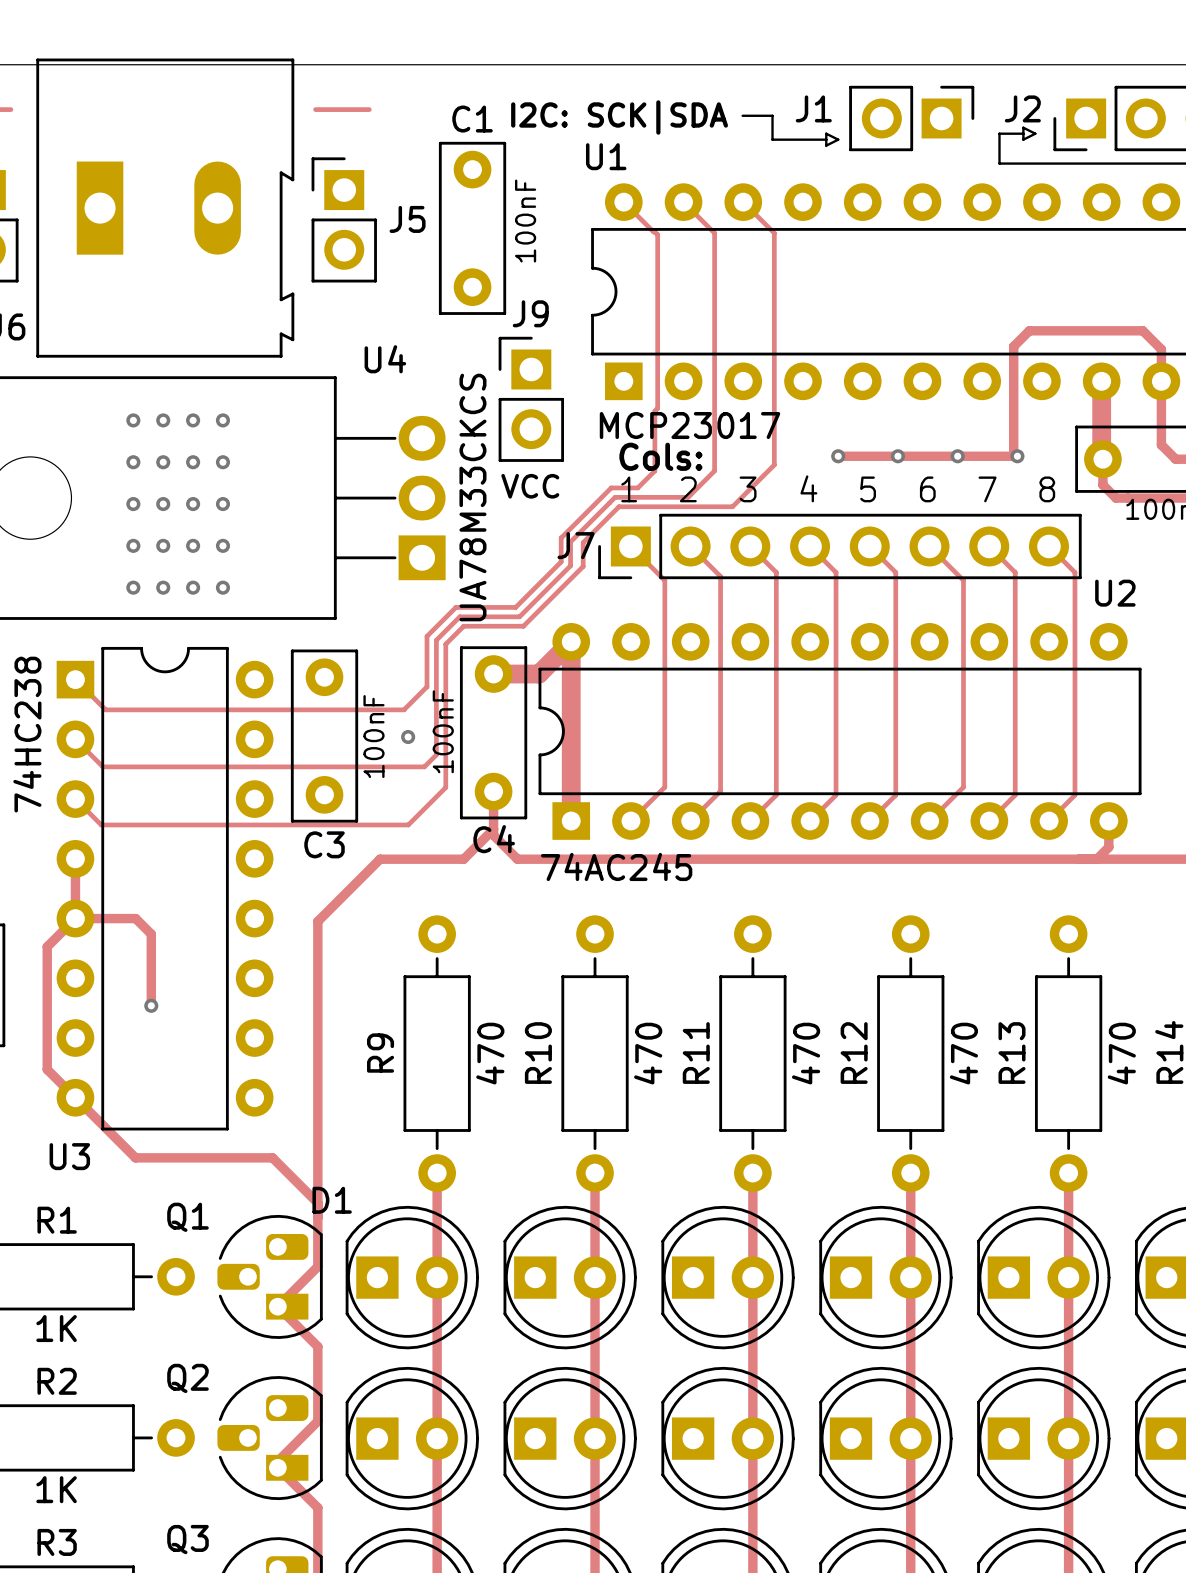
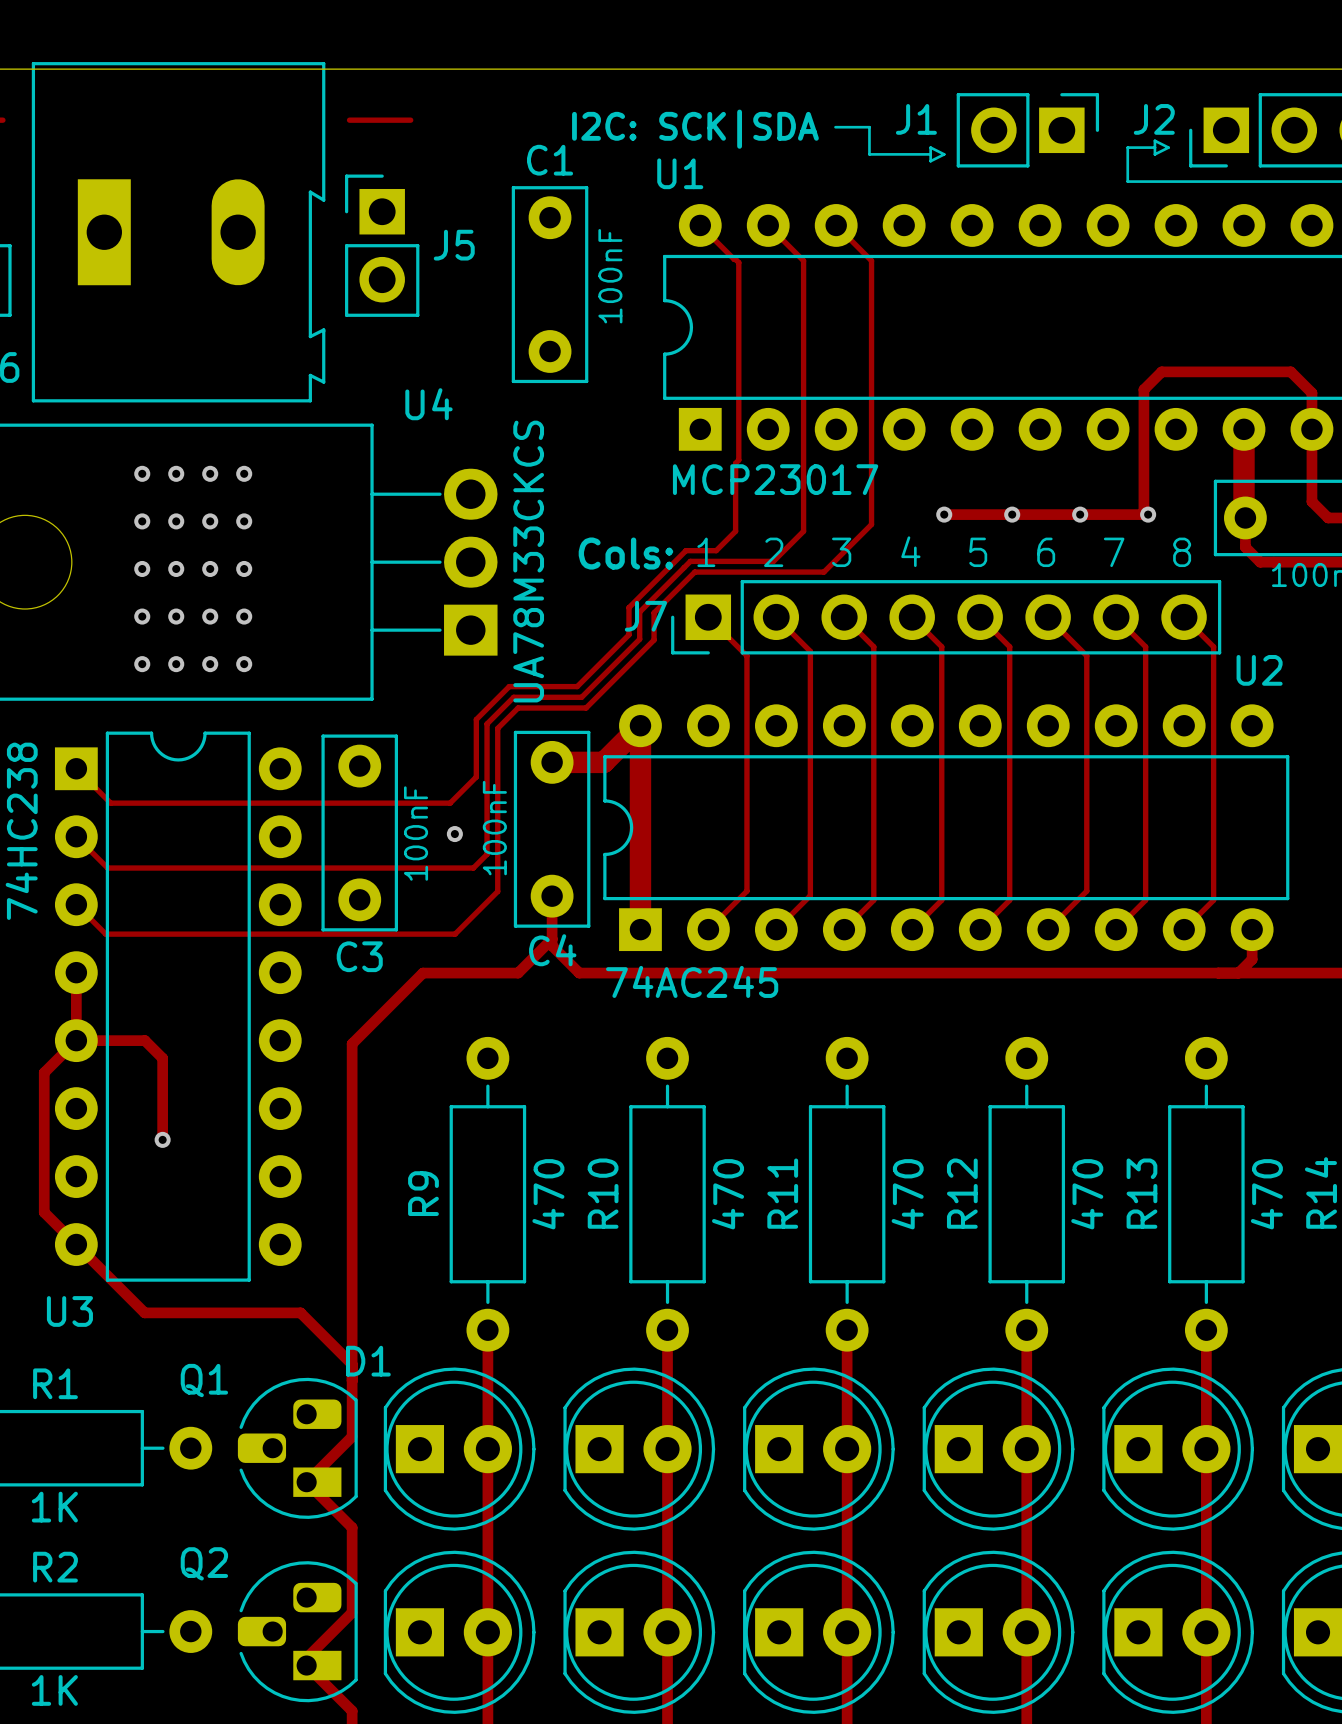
C1 position: (472, 228) -> (550, 284)
J9: VCC (531, 399) -> none
text position: Cols: (660, 456) -> Cols: (625, 553)

